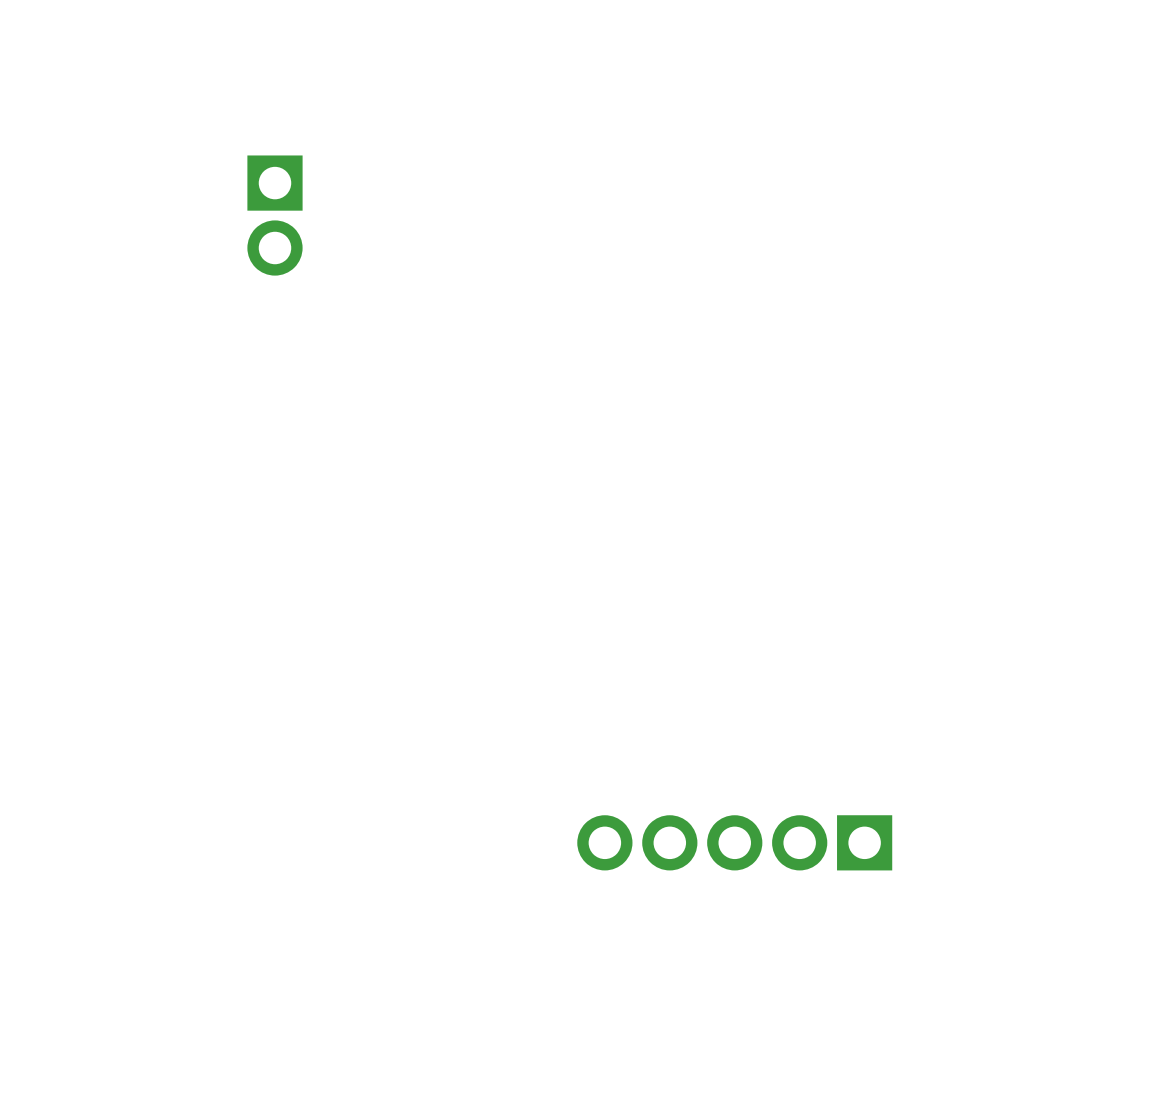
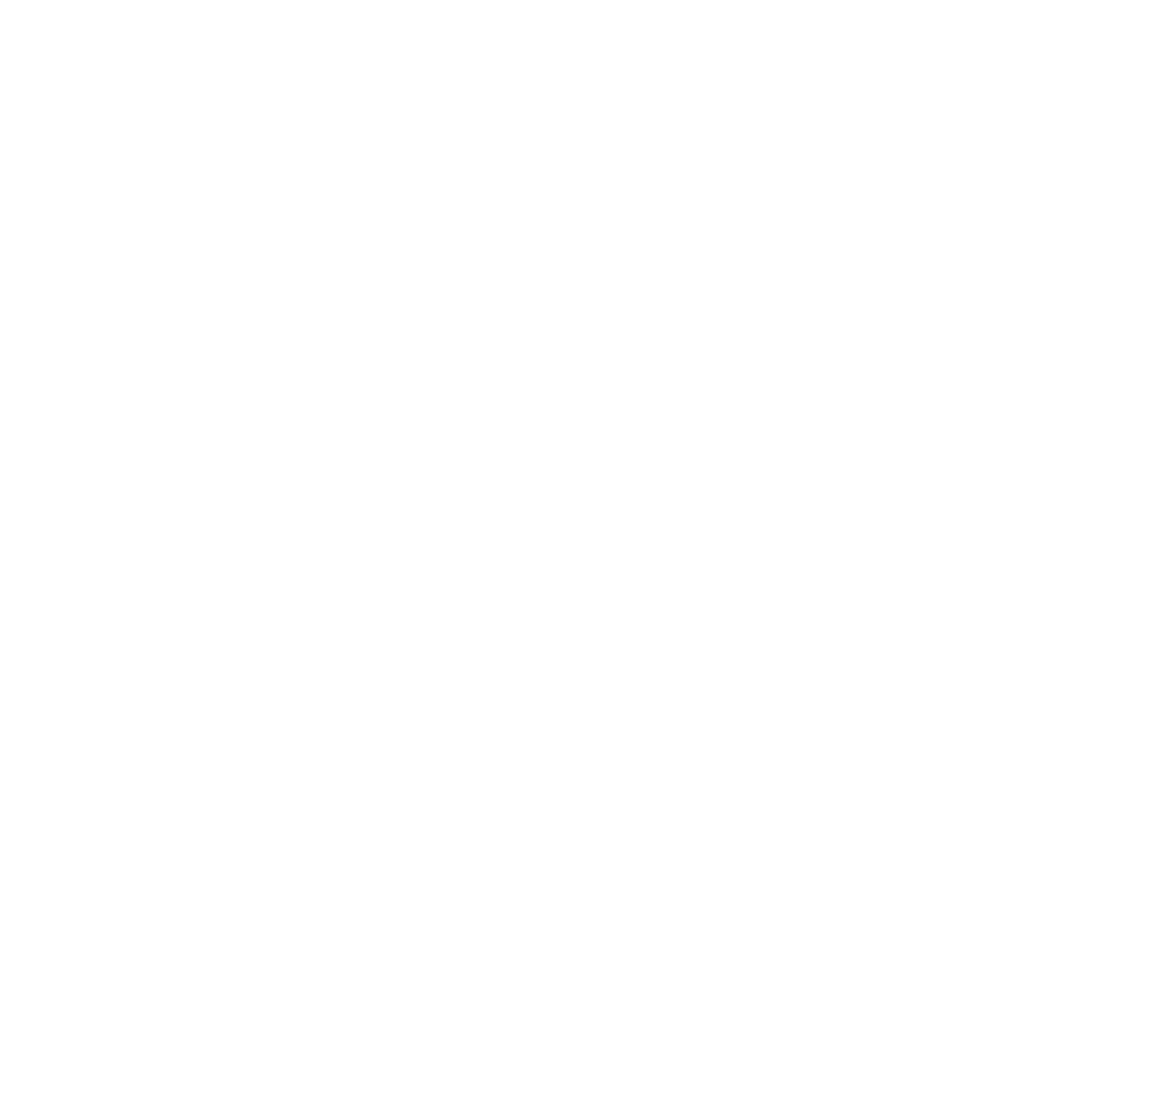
part: (274, 215) -> none
part: (734, 842) -> none

